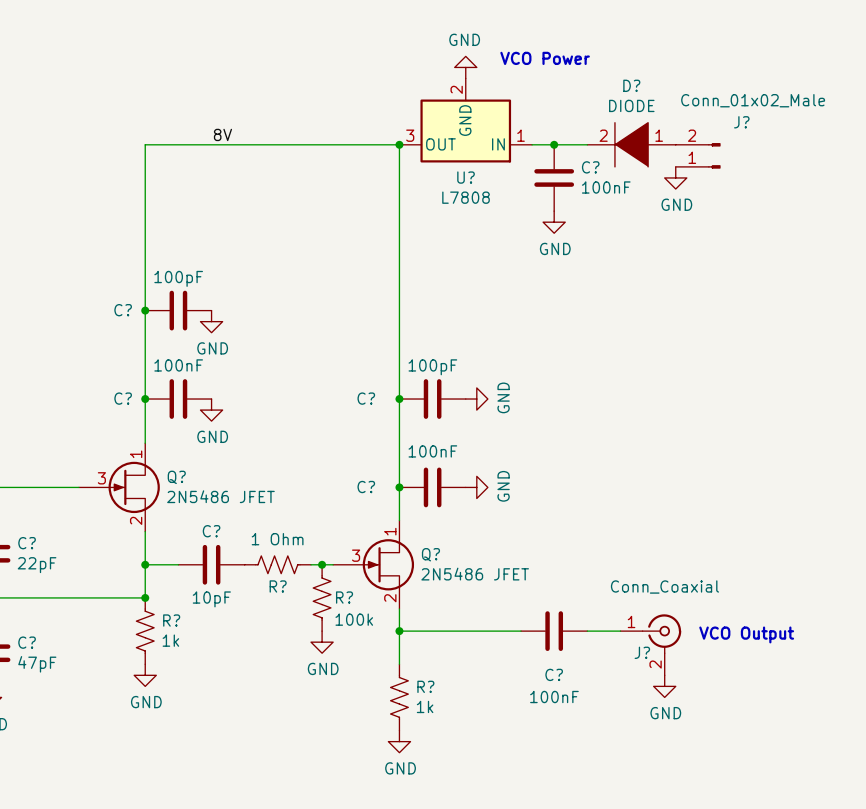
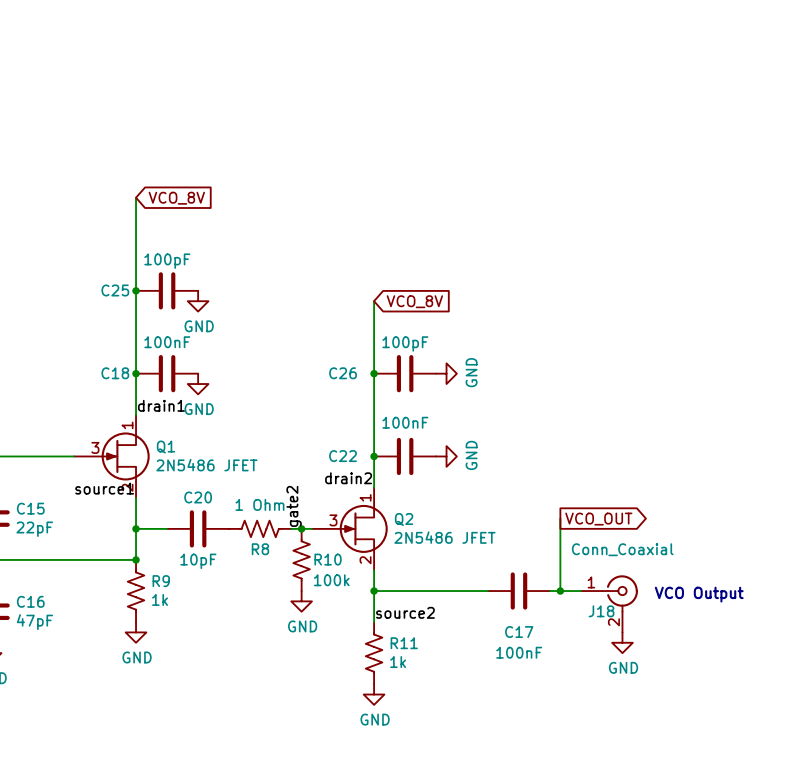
text: VCO Power (545, 58) -> none
power symbol: GND (465, 67) -> none
U?: L7808 (465, 120) -> none
label: 8V (222, 134) -> none
junction: (399, 144) -> none
wire: (532, 144) (587, 144) -> none
junction: (554, 144) -> none
D?: DIODE (631, 144) -> none
J?: Conn_01x02_Male (698, 155) -> none
C?: 100nF (554, 177) -> none
power symbol: GND (675, 177) -> none
wire: (145, 211) (145, 144) (399, 144) (399, 321) -> none
global label: none -> VCO_8V (176, 198)
power symbol: GND (554, 222) -> none
C? name: C? (123, 310) -> C25 (115, 290)
global label: none -> VCO_8V (414, 301)
C? name: C? (123, 398) -> C18 (115, 373)
C? name: C? (366, 398) -> C26 (343, 373)
label: none -> drain1 (161, 405)
Q? name: Q? (176, 477) -> Q1 (166, 447)
C? name: C? (366, 487) -> C22 (343, 456)
label: none -> drain2 (348, 478)
label: none -> source1 (104, 488)
C? name: C? (211, 531) -> C20 (198, 497)
label: none -> gate2 (294, 506)
C? name: C? (27, 543) -> C15 (30, 508)
wire: none -> (560, 518) (560, 591)
Q? name: Q? (430, 554) -> Q2 (404, 519)
global label: none -> VCO_OUT (598, 519)
R? name: R? (278, 586) -> R8 (260, 549)
R? name: R? (344, 597) -> R10 (328, 559)
R? name: R? (171, 620) -> R9 (161, 581)
junction: none -> (560, 591)
C? name: C? (27, 642) -> C16 (30, 601)
J? name: J? (642, 652) -> J18 (601, 611)
label: none -> source2 (405, 612)
C? name: C? (554, 674) -> C17 (519, 632)
R? name: R? (425, 686) -> R11 (404, 643)

